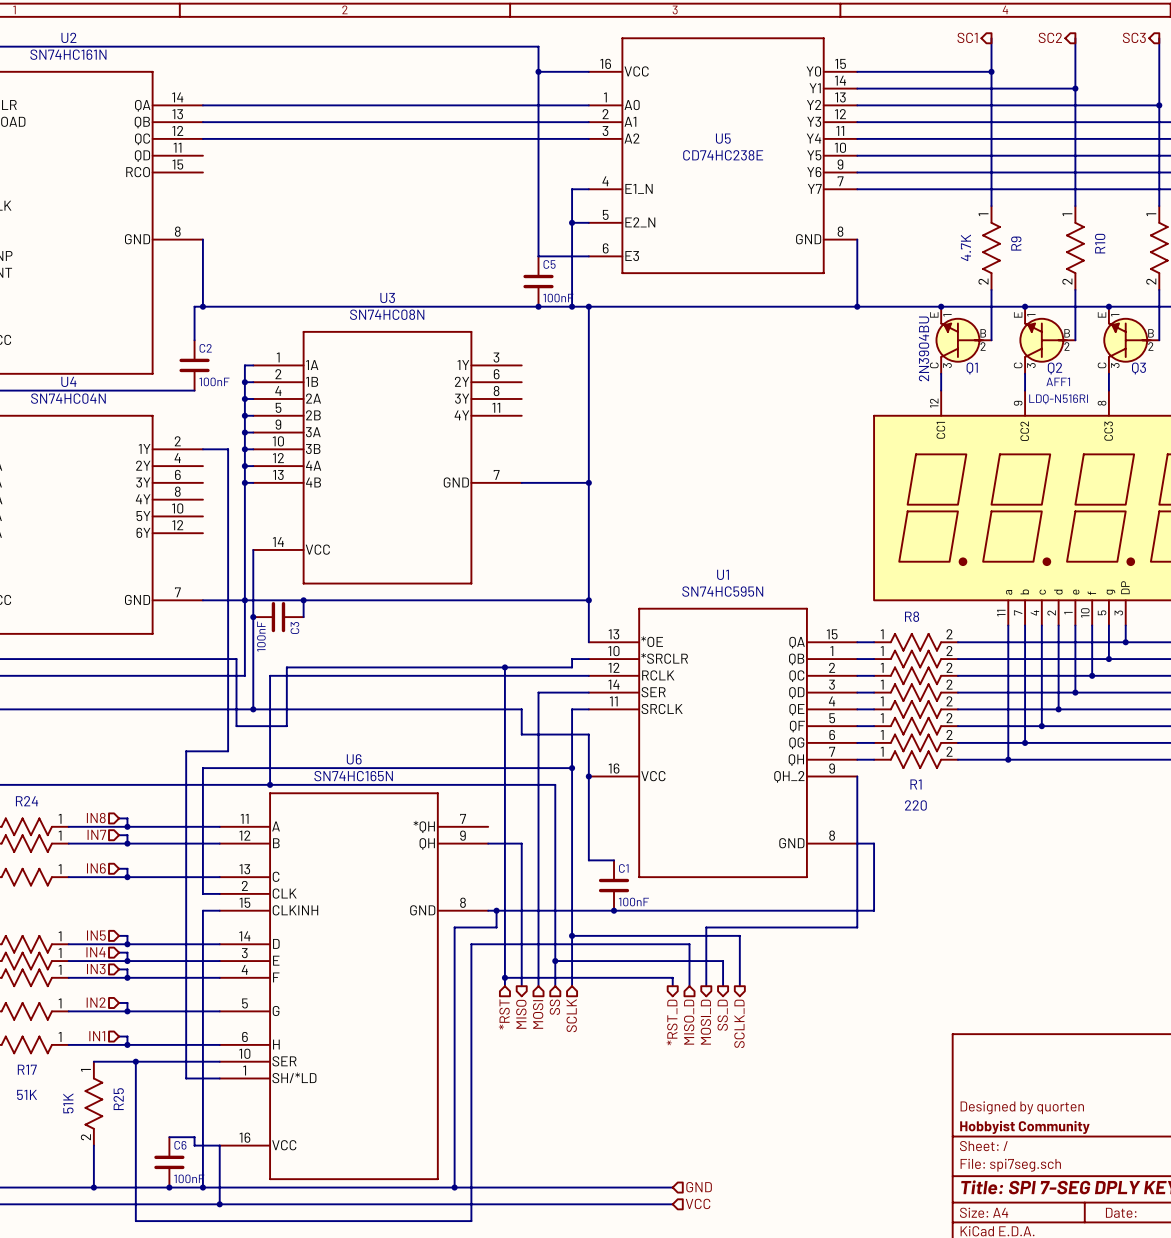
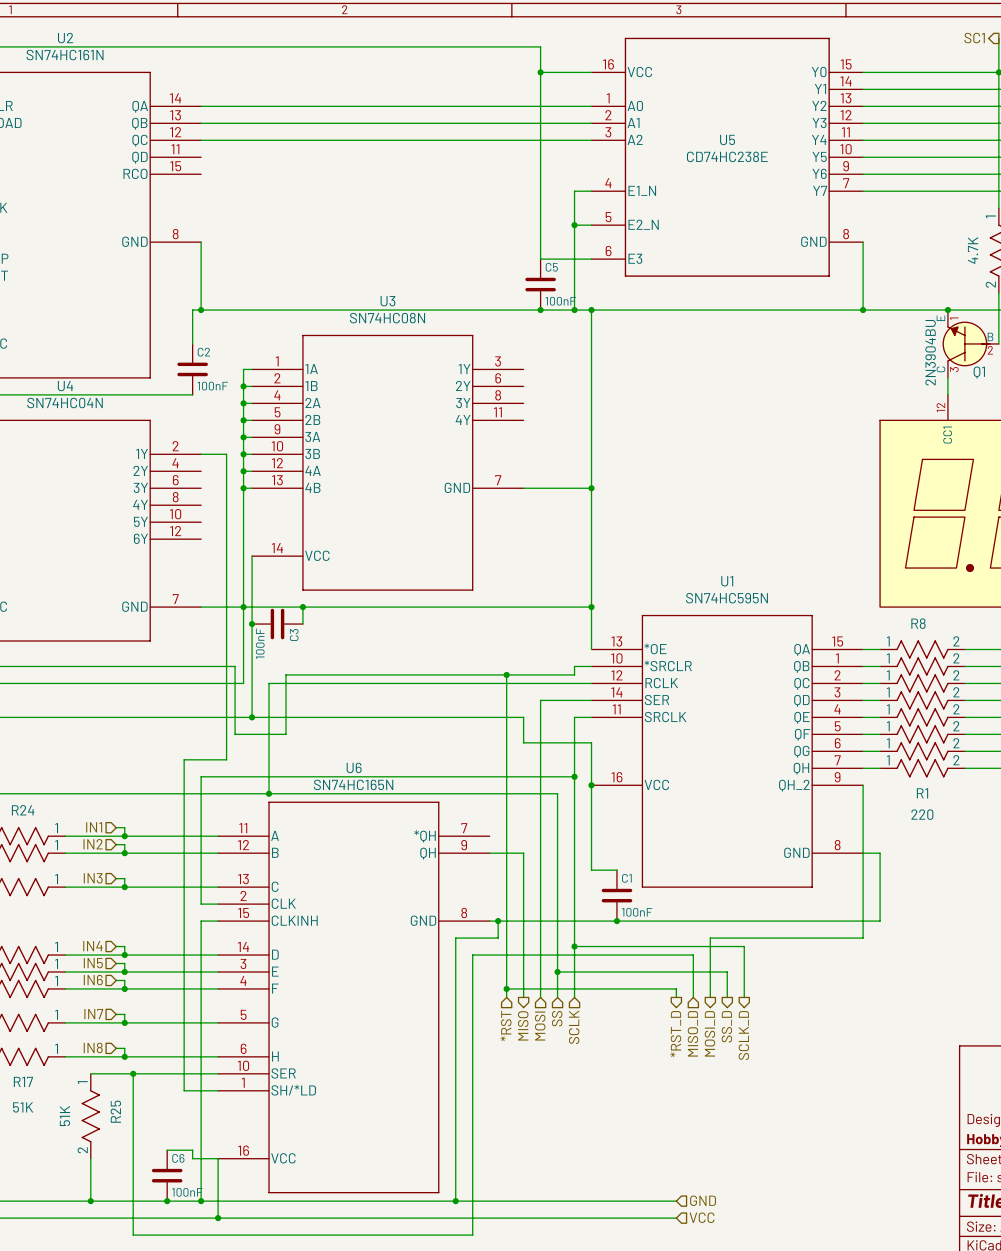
hierarchical label: IN8 (96, 818) -> IN1 (94, 827)
hierarchical label: IN7 (96, 834) -> IN2 (93, 844)
hierarchical label: IN6 (96, 868) -> IN3 (93, 878)
hierarchical label: IN5 (96, 935) -> IN4 (92, 946)
hierarchical label: IN4 (96, 952) -> IN5 (93, 963)
hierarchical label: IN3 (96, 969) -> IN6 (93, 980)
hierarchical label: IN2 (96, 1002) -> IN7 (93, 1014)
hierarchical label: IN1 (97, 1036) -> IN8 (93, 1047)

